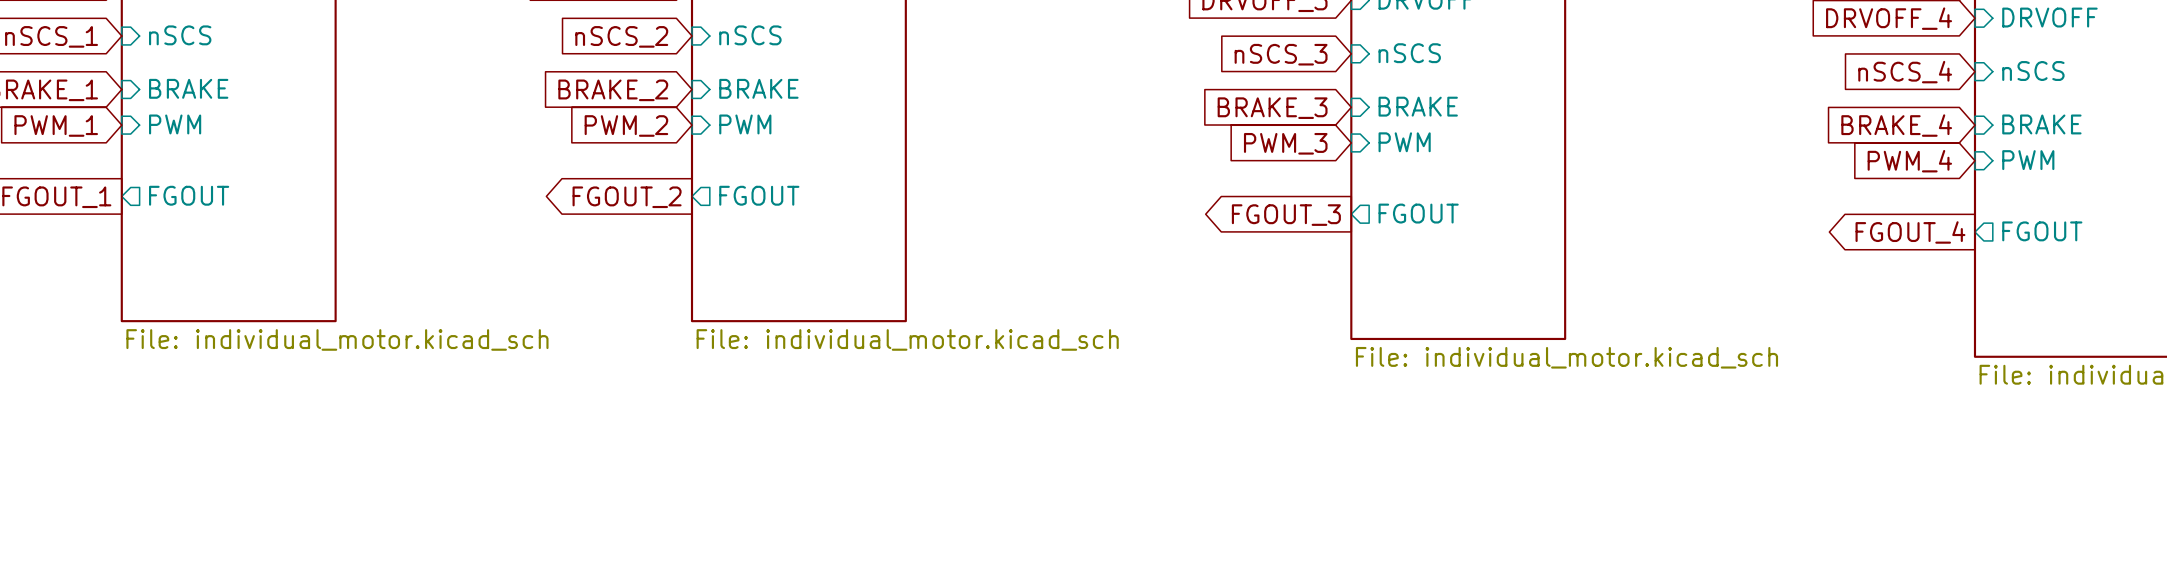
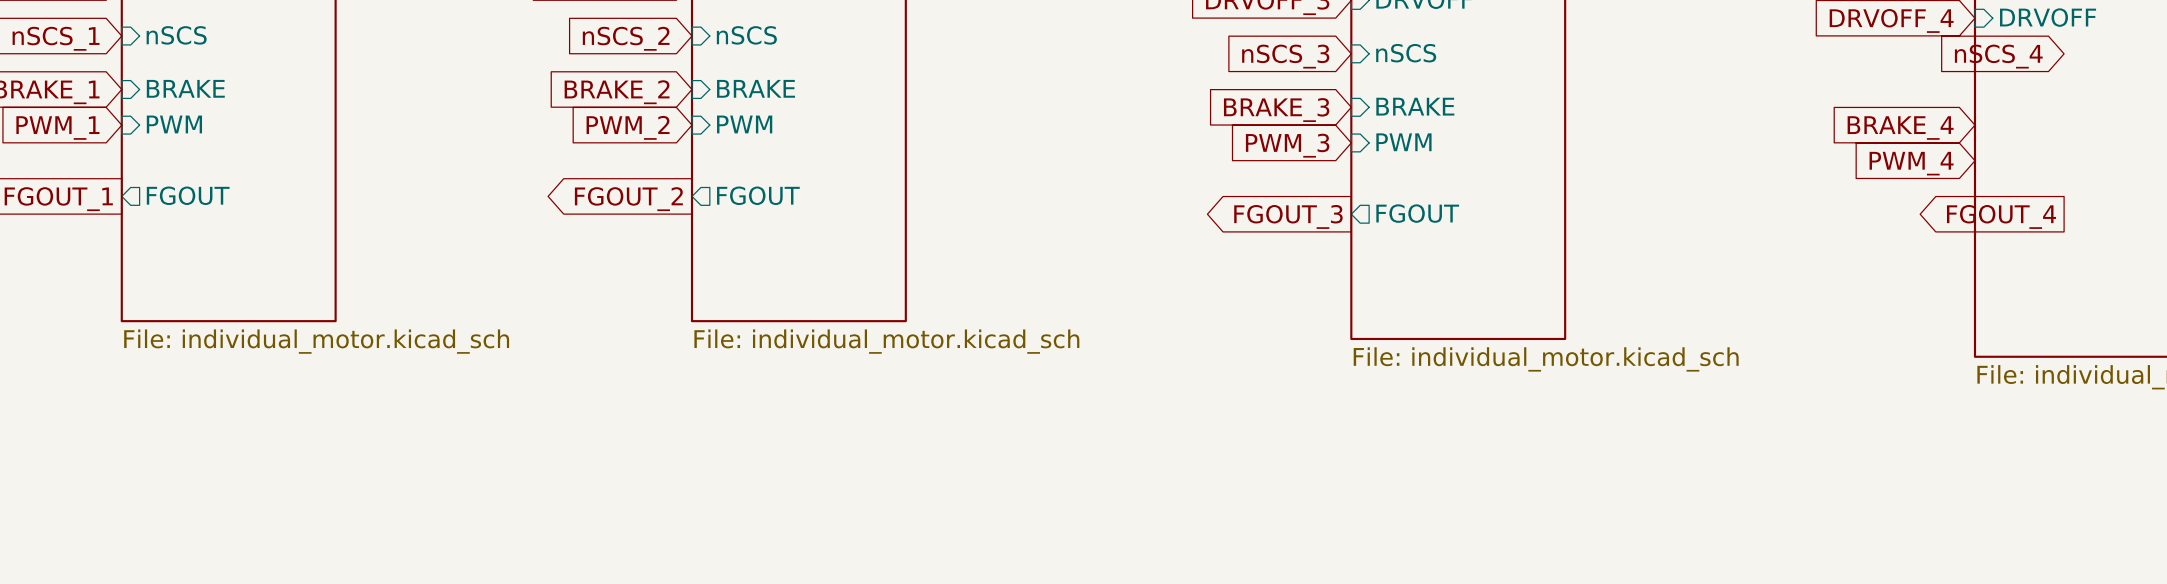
sheet pin: nSCS (2033, 71) -> none
global label position: nSCS_4 (1905, 72) -> nSCS_4 (1998, 56)
sheet pin: BRAKE (2041, 124) -> none
sheet pin: PWM (2028, 160) -> none
sheet pin: FGOUT (2042, 231) -> none
global label position: FGOUT_4 (1910, 232) -> FGOUT_4 (2001, 216)

